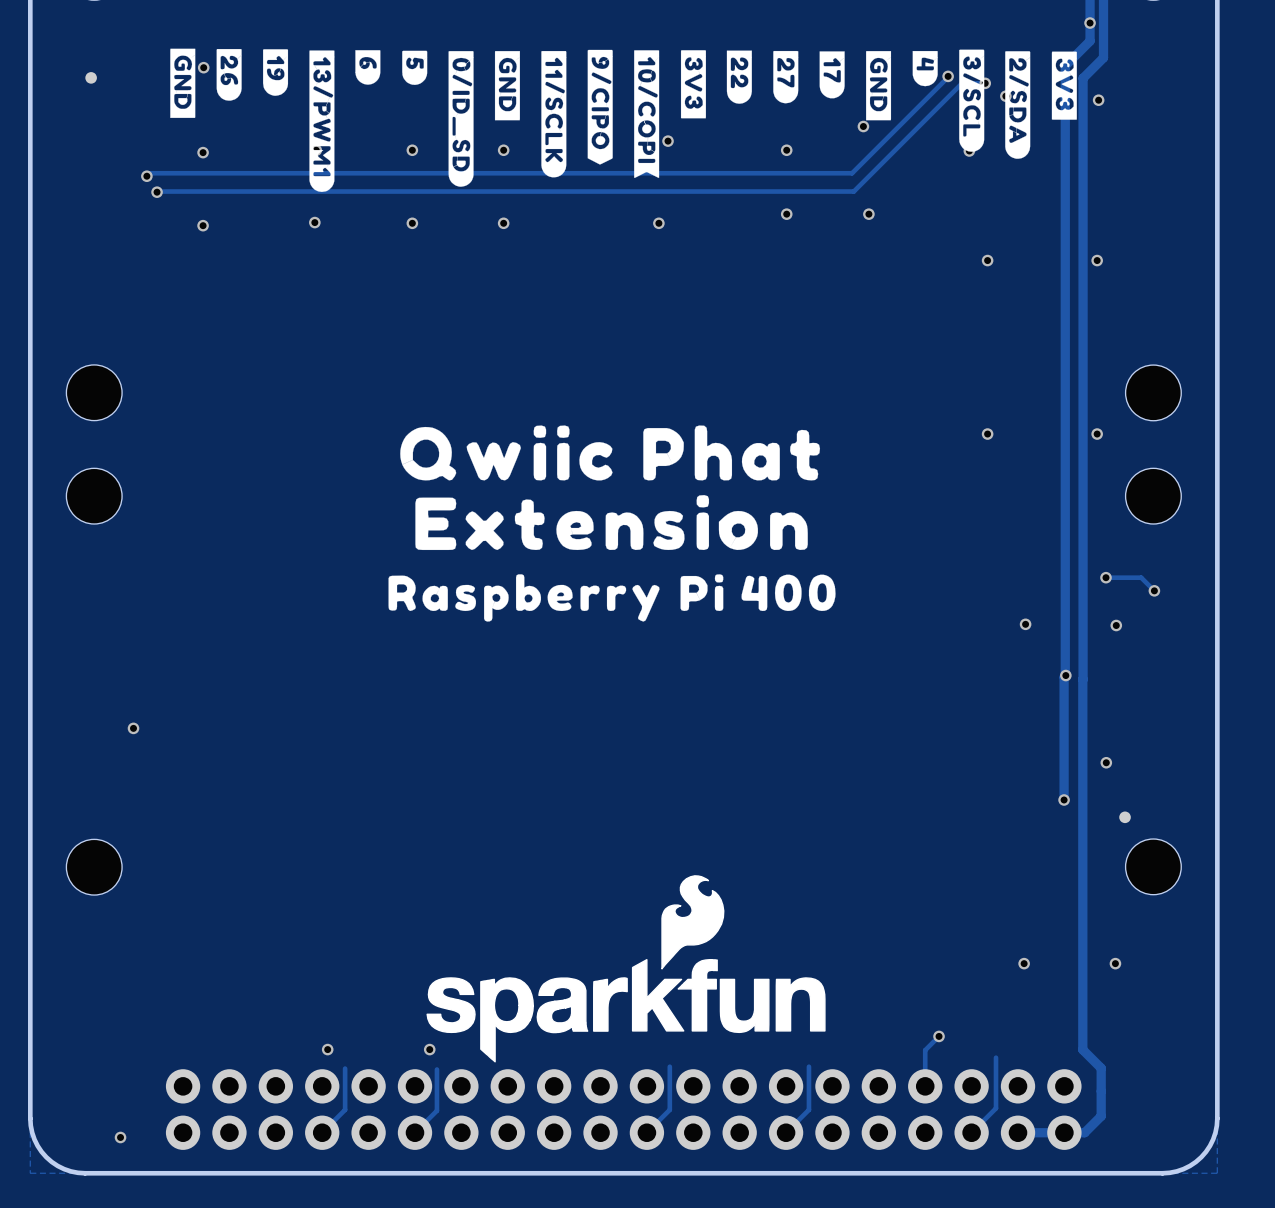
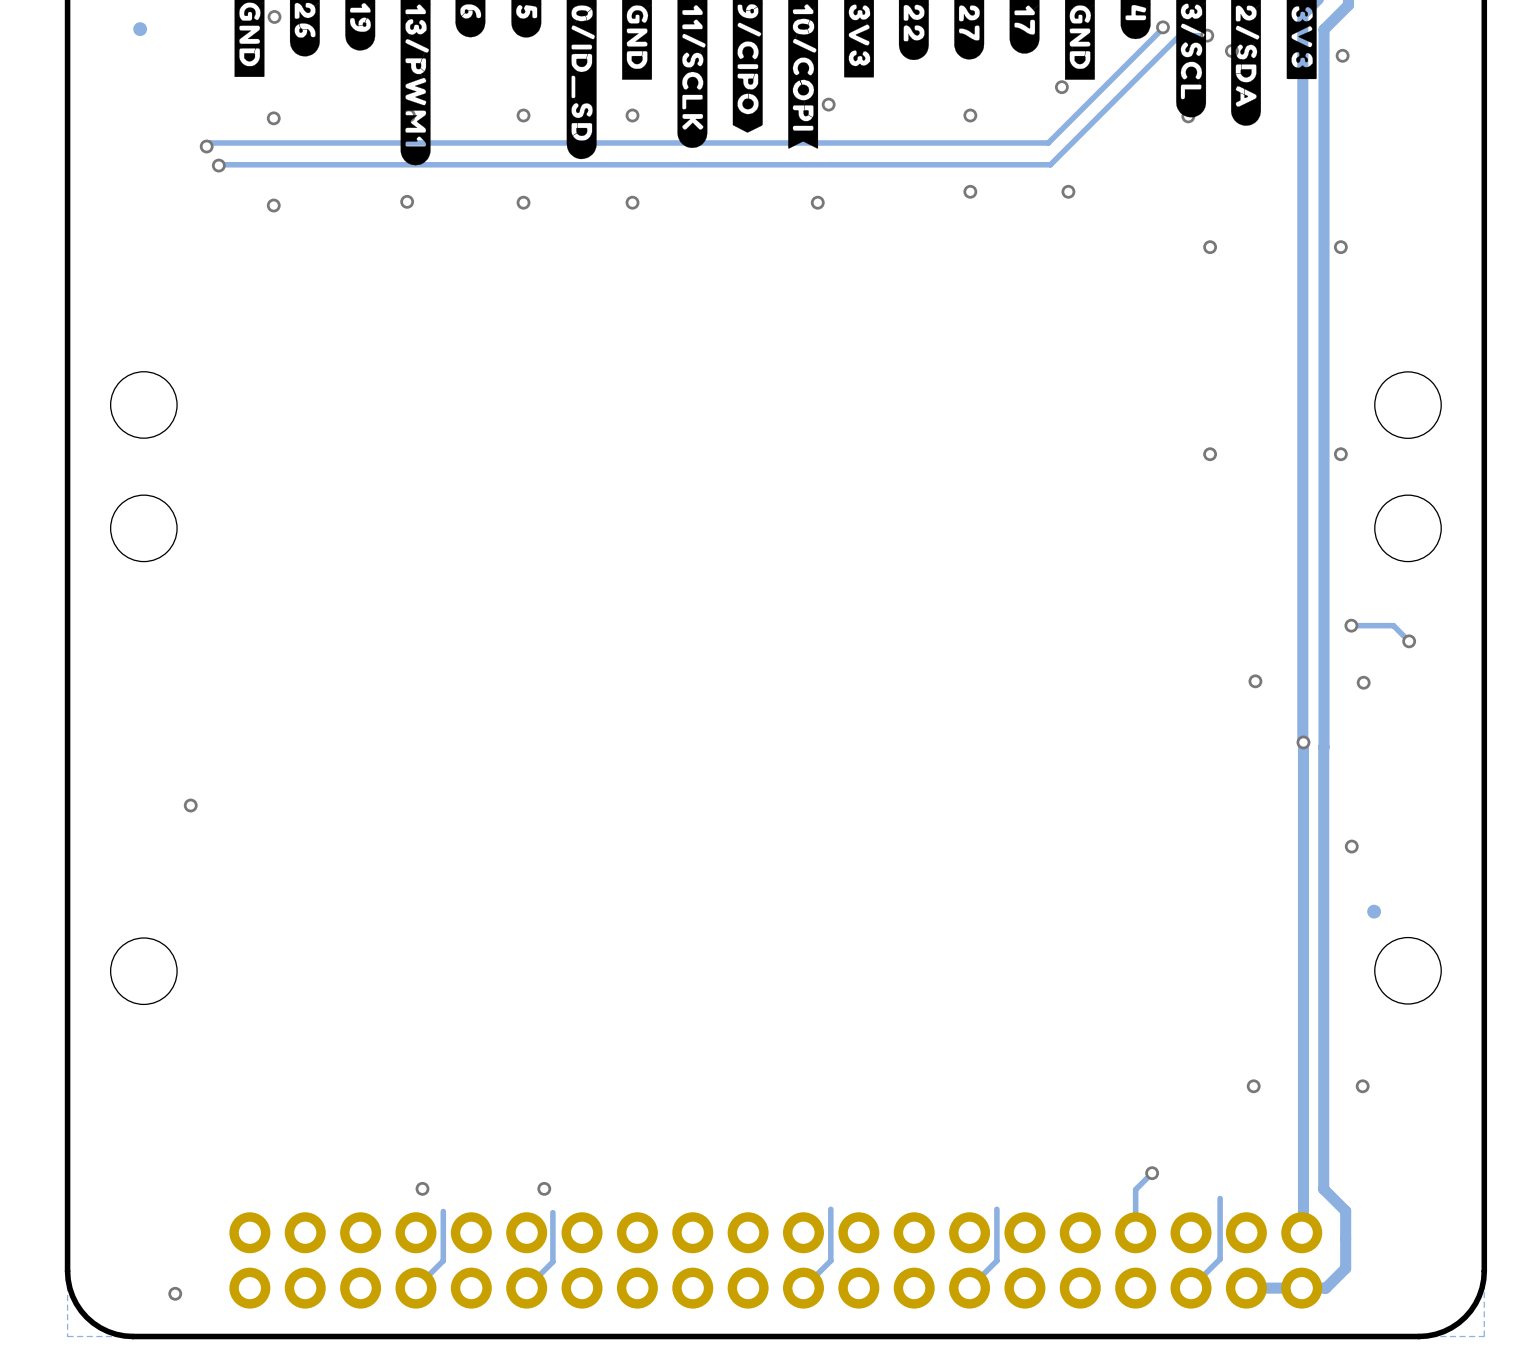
drawing: [400, 425, 821, 551] -> none
drawing: [388, 574, 836, 622] -> none
track: (1065, 675) (1064, 677) (1064, 799) -> (1303, 742) (1303, 1231) (1301, 1232)
via: (1064, 799) -> none
drawing: [426, 875, 826, 1063] -> none

